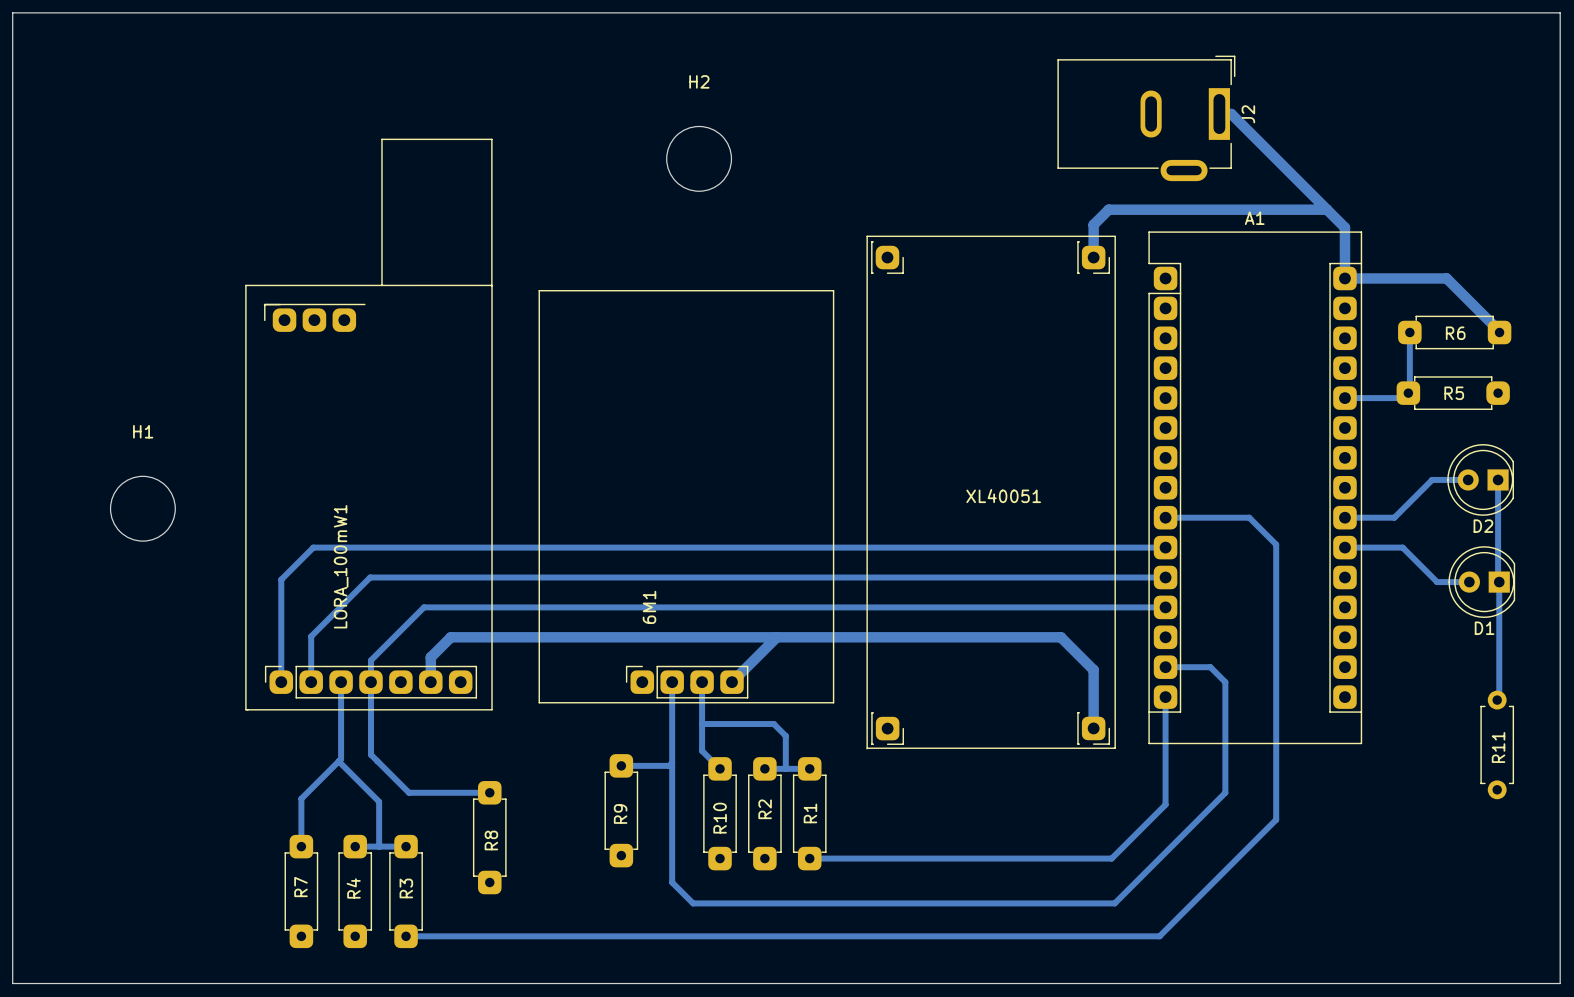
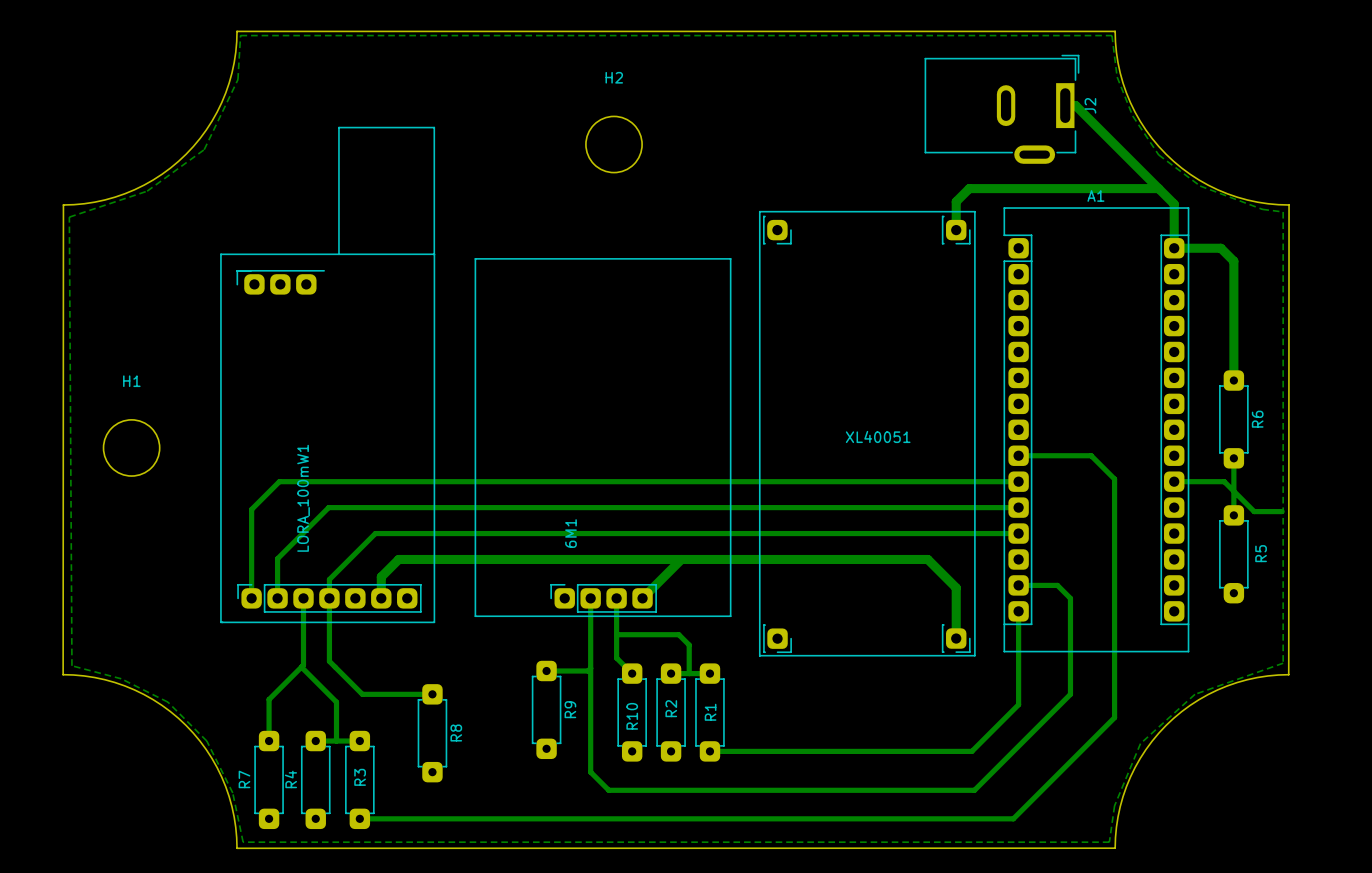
board edge: (12, 12) (12, 983) (1560, 983) (1560, 12) (12, 12) -> (237, 31) (1115, 31) (1120, 73) (1130, 102) (1145, 130) (1166, 154) (1190, 174) (1217, 189) (1247, 200) (1289, 205) (1288, 674) (1257, 677) (1217, 689) (1190, 705) (1166, 725) (1140, 758) (1126, 786) (1118, 816) (1115, 848) (237, 848) (234, 816) (225, 786) (211, 758) (186, 725) (161, 705) (134, 689) (94, 677) (63, 674) (63, 205) (94, 202) (124, 193) (153, 179) (186, 154) (206, 130) (225, 92) (234, 62) (235, 52) (236, 41) (237, 31)
bottom zone outline: none -> (240, 35) (237, 79) (204, 149) (147, 191) (69, 217) (71, 665) (121, 678) (167, 702) (206, 741) (232, 792) (243, 842) (1109, 842) (1114, 805) (1140, 743) (1194, 694) (1283, 663) (1283, 211) (1262, 209) (1200, 186) (1158, 154) (1132, 115) (1117, 77) (1111, 35) (240, 35)
bottom track: (1398, 278) (1446, 278) (1499, 332) -> (1220, 248) (1233, 261) (1233, 380)
bottom track: (1409, 332) (1409, 391) (1403, 398) (1344, 398) -> none
R6 rotation: 0° (1454, 332) -> 90° clockwise (1233, 419)
R6 position: (1454, 332) -> (1233, 419)
R6 name position: R6 (1455, 333) -> R6 (1257, 419)
R5 rotation: 0° (1453, 393) -> 90° clockwise (1233, 554)
R5 position: (1453, 393) -> (1233, 554)
R5 name position: R5 (1454, 393) -> R5 (1261, 553)
bottom track: (1468, 479) (1432, 479) (1394, 517) (1345, 517) -> none
D2: (1480, 479) -> none
bottom track: (1498, 479) (1499, 698) (1497, 700) -> none
bottom track: none -> (1233, 458) (1233, 515)
D1: (1481, 582) -> none
R11: (1497, 744) -> none
R9 name position: R9 (620, 814) -> R9 (570, 709)
R8 name position: R8 (491, 840) -> R8 (456, 733)
R7 name position: R7 (300, 887) -> R7 (244, 779)
R4 name position: R4 (353, 888) -> R4 (290, 779)

